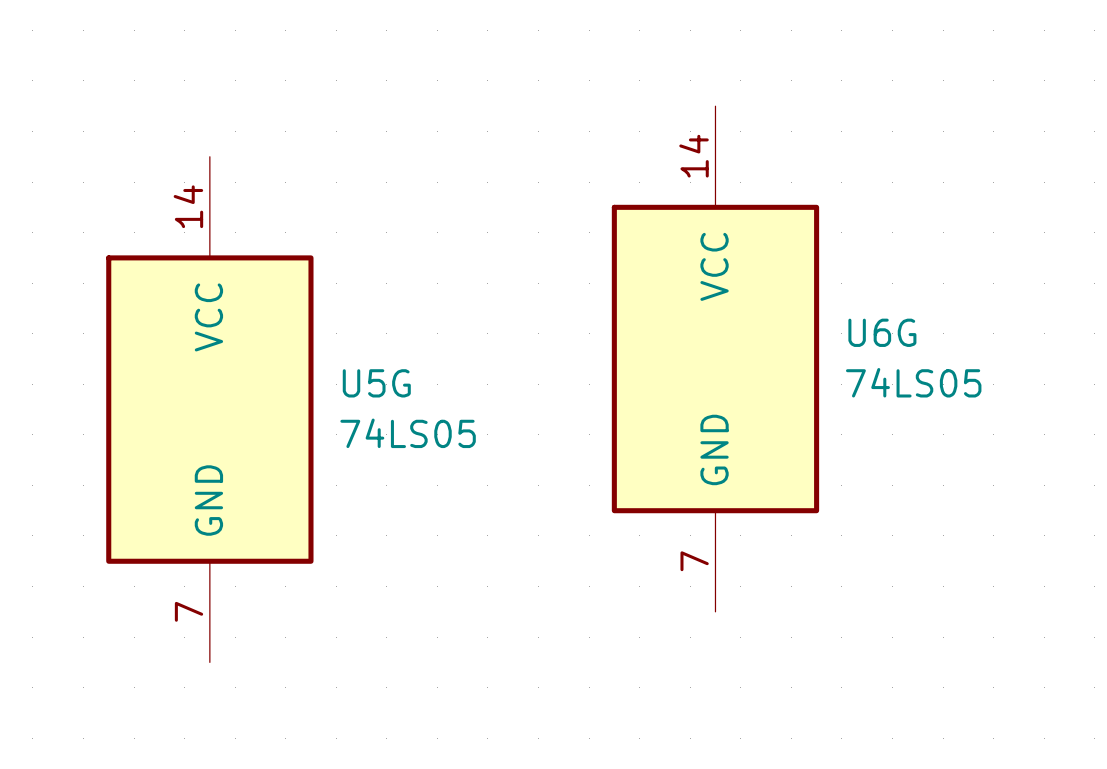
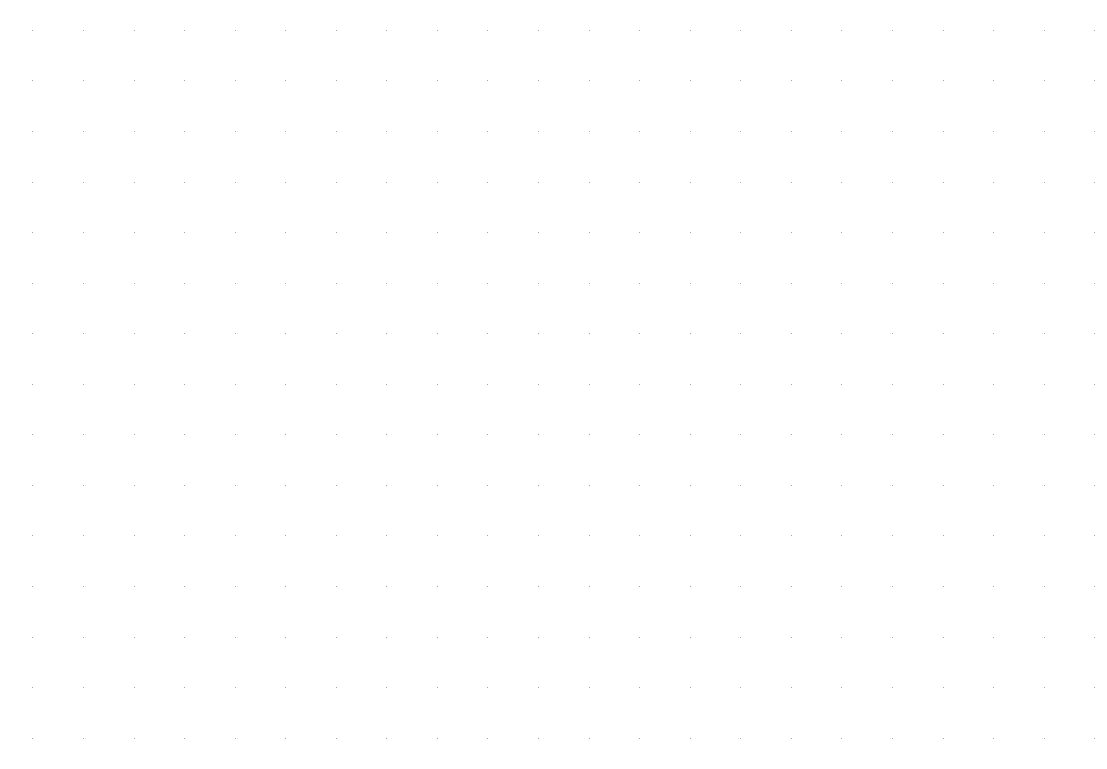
U6G: 74LS05 (715, 359) -> none
U5G: 74LS05 (209, 409) -> none

